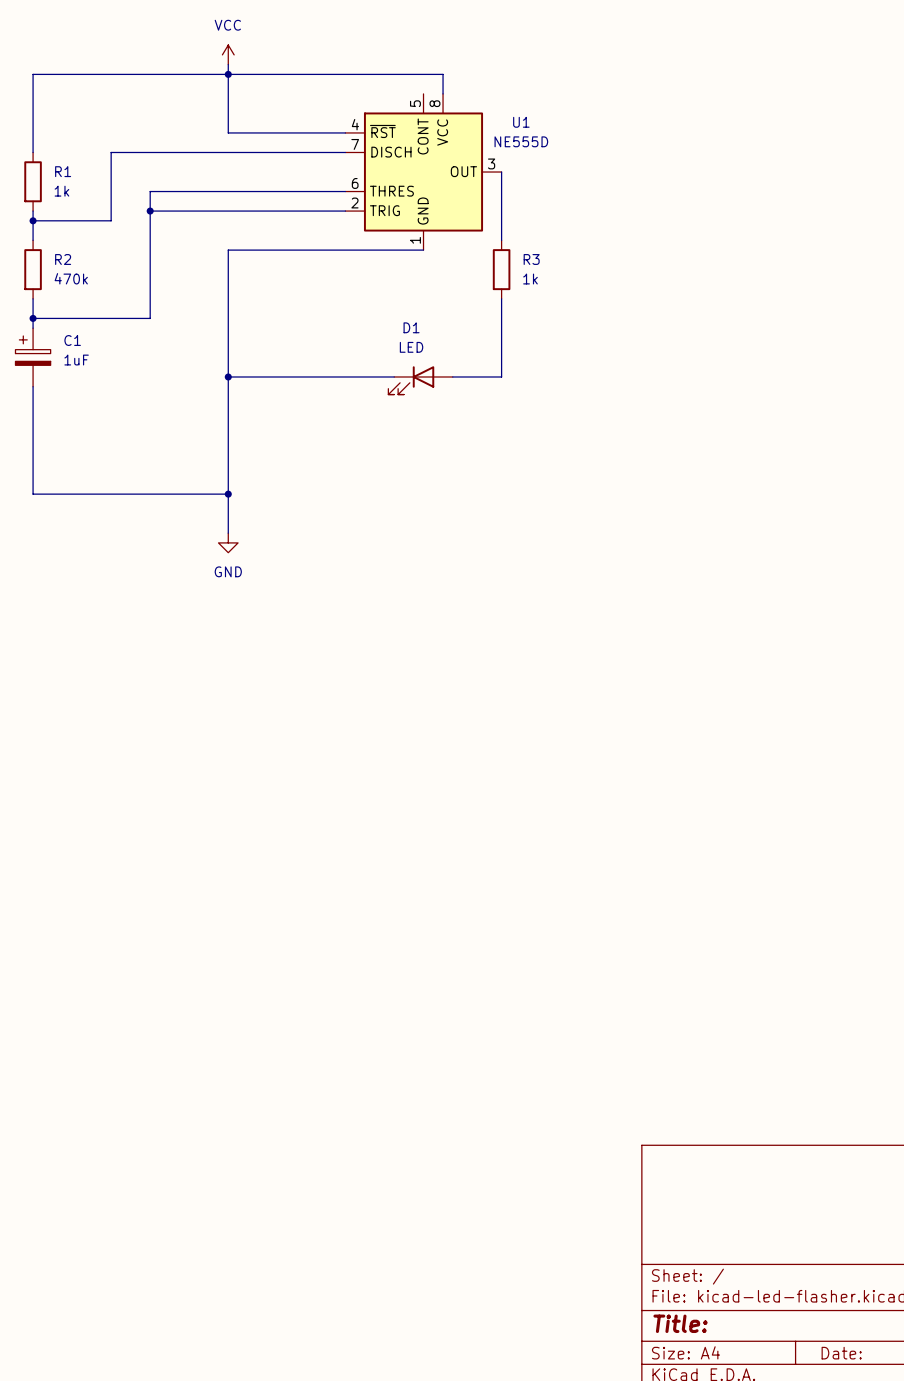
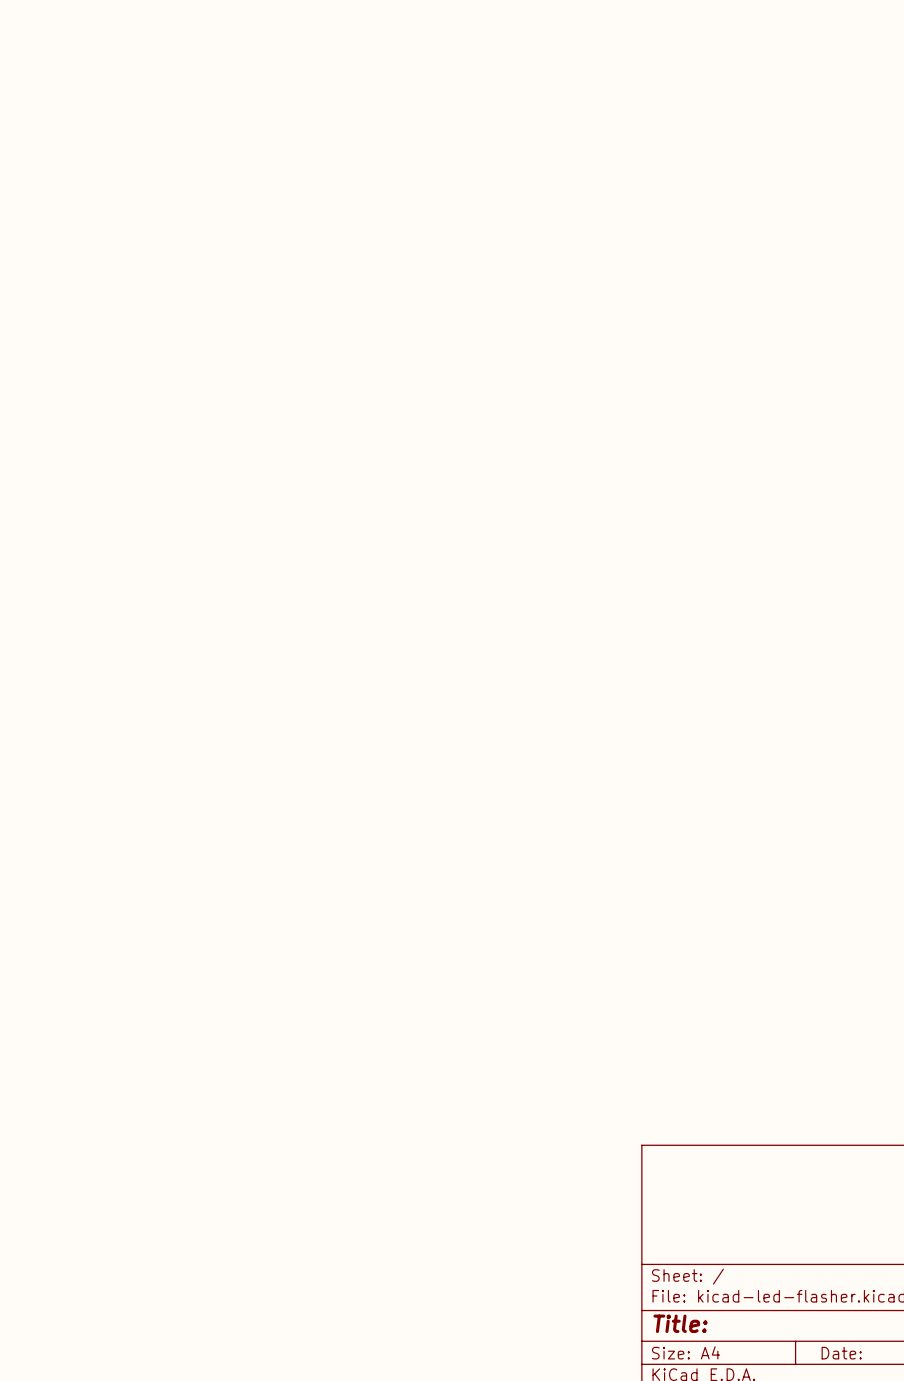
power symbol: VCC (228, 54) -> none
wire: (228, 64) (228, 132) (345, 132) -> none
junction: (228, 74) -> none
wire: (443, 93) (443, 74) (33, 74) (33, 152) -> none
wire: (345, 152) (111, 152) (111, 220) (33, 220) -> none
U1: NE555D (423, 172) -> none
wire: (501, 172) (501, 240) -> none
R1: 1k (33, 181) -> none
wire: (345, 191) (150, 191) (150, 318) (33, 318) -> none
wire: (33, 211) (33, 240) -> none
wire: (150, 211) (345, 211) -> none
junction: (150, 211) -> none
junction: (33, 220) -> none
wire: (423, 250) (228, 250) (228, 533) -> none
R2: 470k (33, 269) -> none
R3: 1k (501, 269) -> none
wire: (33, 298) (33, 328) -> none
wire: (501, 298) (501, 376) (452, 376) -> none
junction: (33, 318) -> none
C1: 1uF (33, 357) -> none
wire: (228, 376) (394, 376) -> none
junction: (228, 376) -> none
D1: LED (420, 380) -> none
wire: (33, 386) (33, 494) (228, 494) -> none
junction: (228, 494) -> none
power symbol: GND (228, 542) -> none

